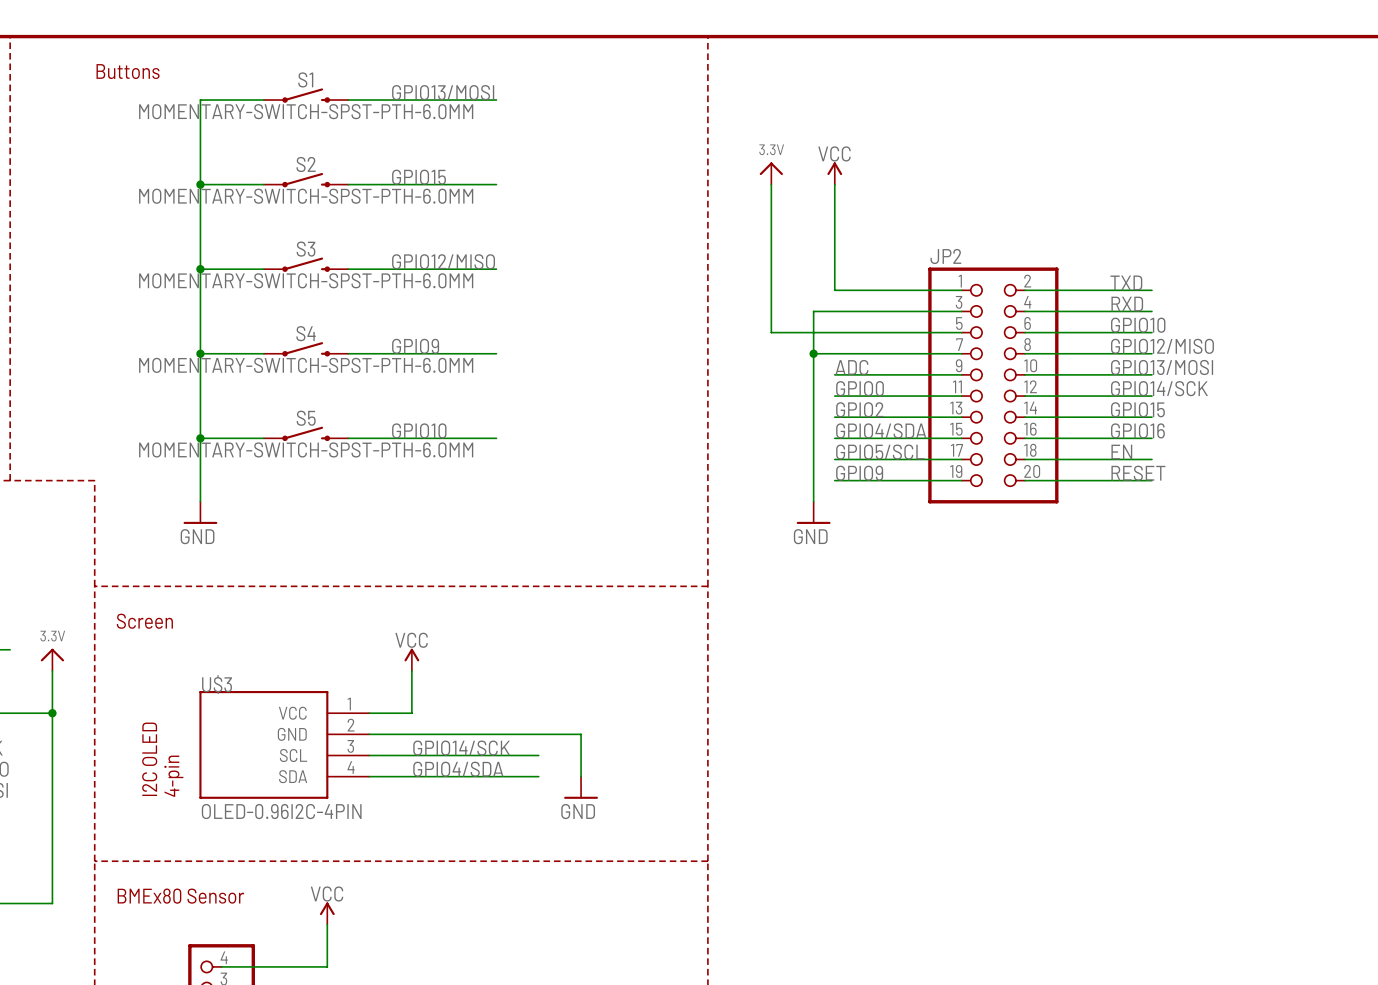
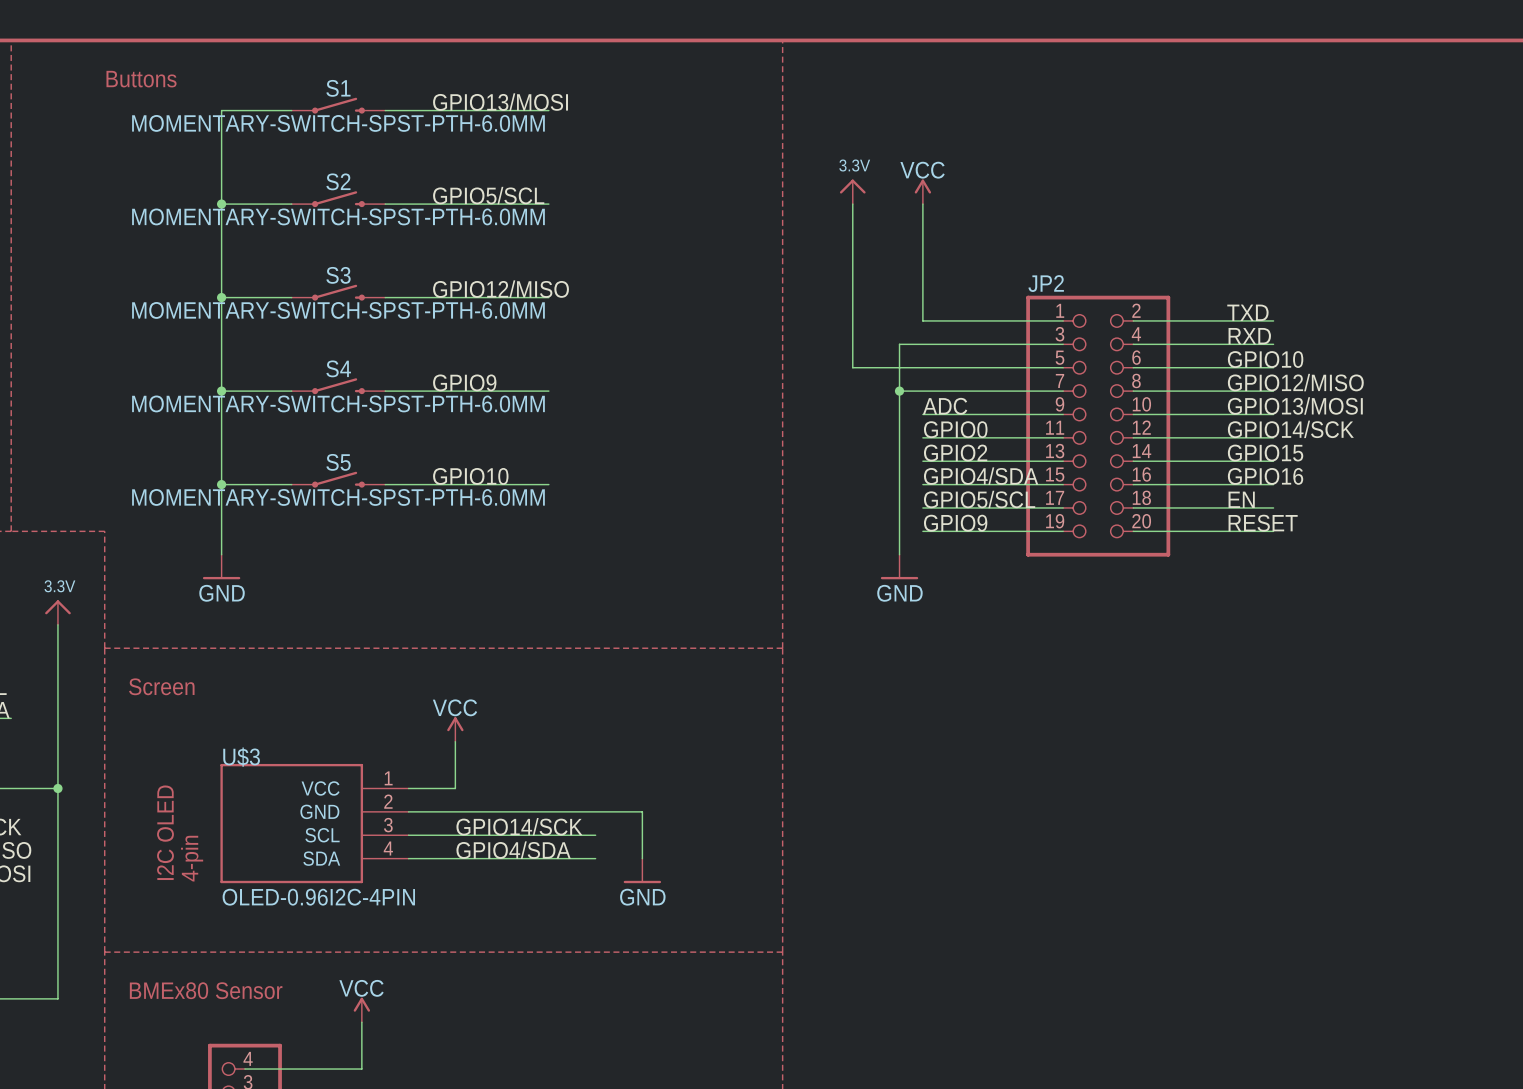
label: GPIO15 (419, 177) -> GPIO5/SCL (488, 195)
wire: none -> (57, 624) (57, 741)
power symbol position: 3.3V (52, 659) -> 3.3V (57, 612)

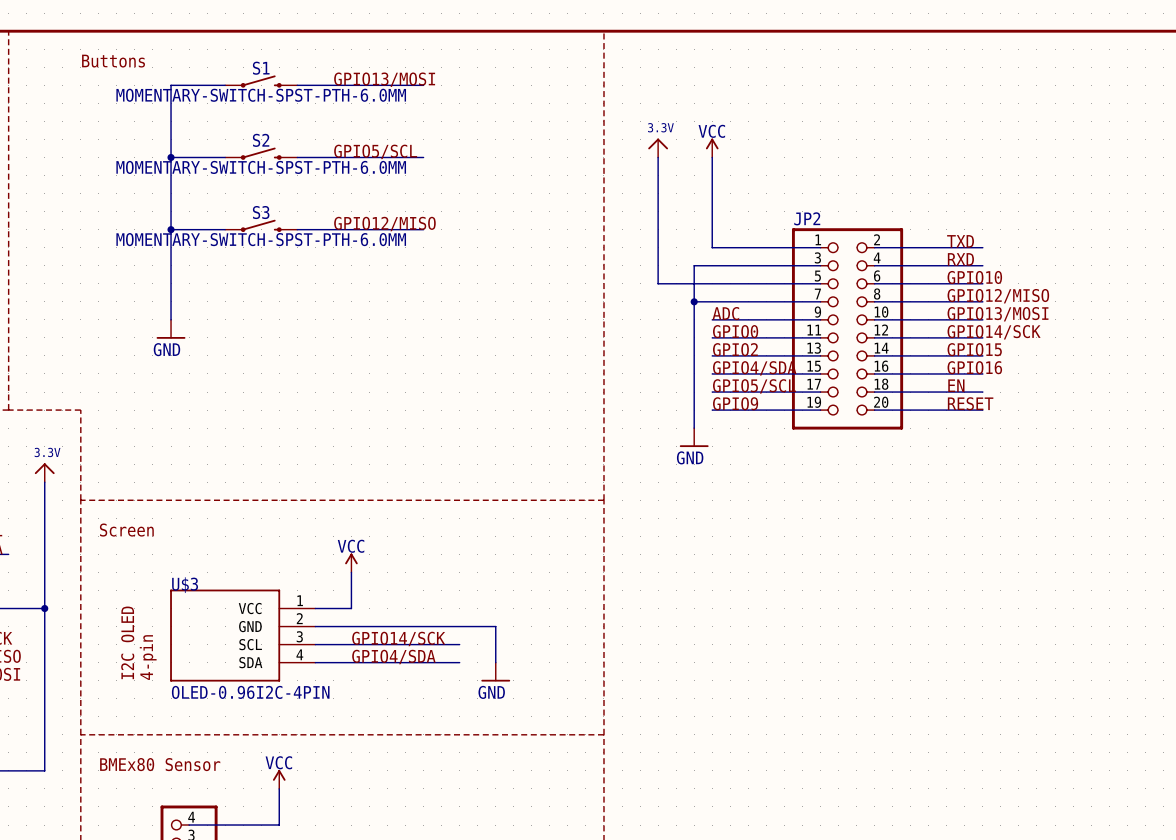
label: GPIO9 (464, 382) -> none
S4: MOMENTARY-SWITCH-SPST-PTH-6.0MM (338, 386) -> none
wire: (221, 391) (291, 391) -> none
junction: (221, 391) -> none
wire: (385, 391) (548, 391) -> none
wire: (221, 414) (221, 554) -> none
label: GPIO10 (470, 476) -> none
S5: MOMENTARY-SWITCH-SPST-PTH-6.0MM (338, 479) -> none
wire: (221, 484) (291, 484) -> none
junction: (221, 484) -> none
wire: (385, 484) (548, 484) -> none
power symbol position: GND (221, 567) -> GND (171, 329)

